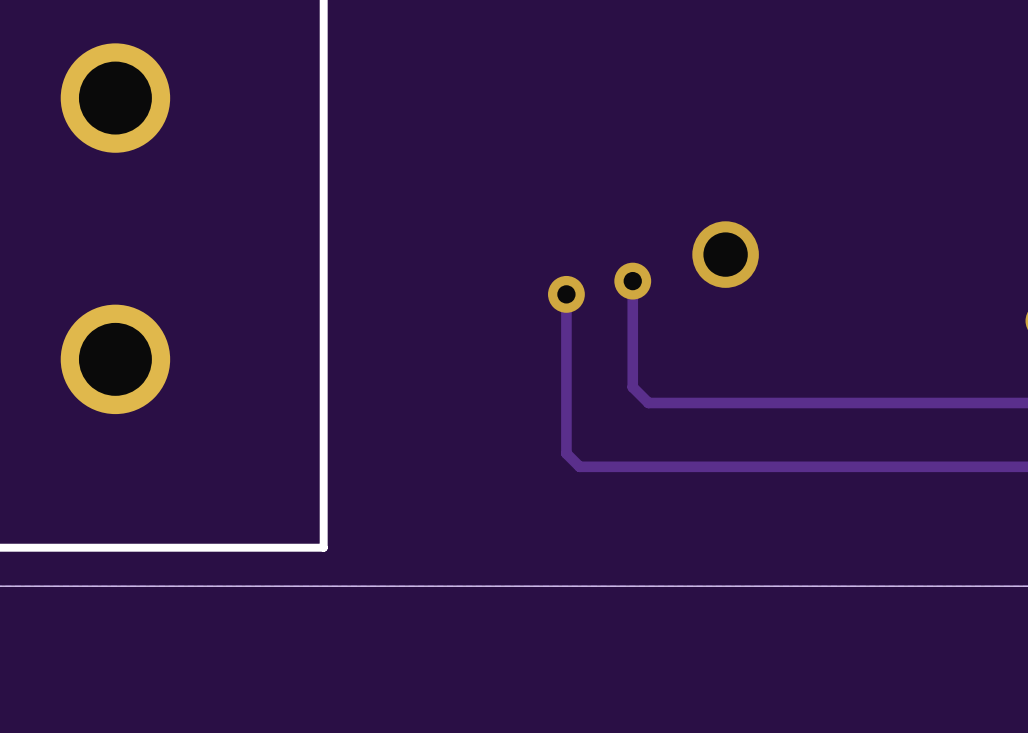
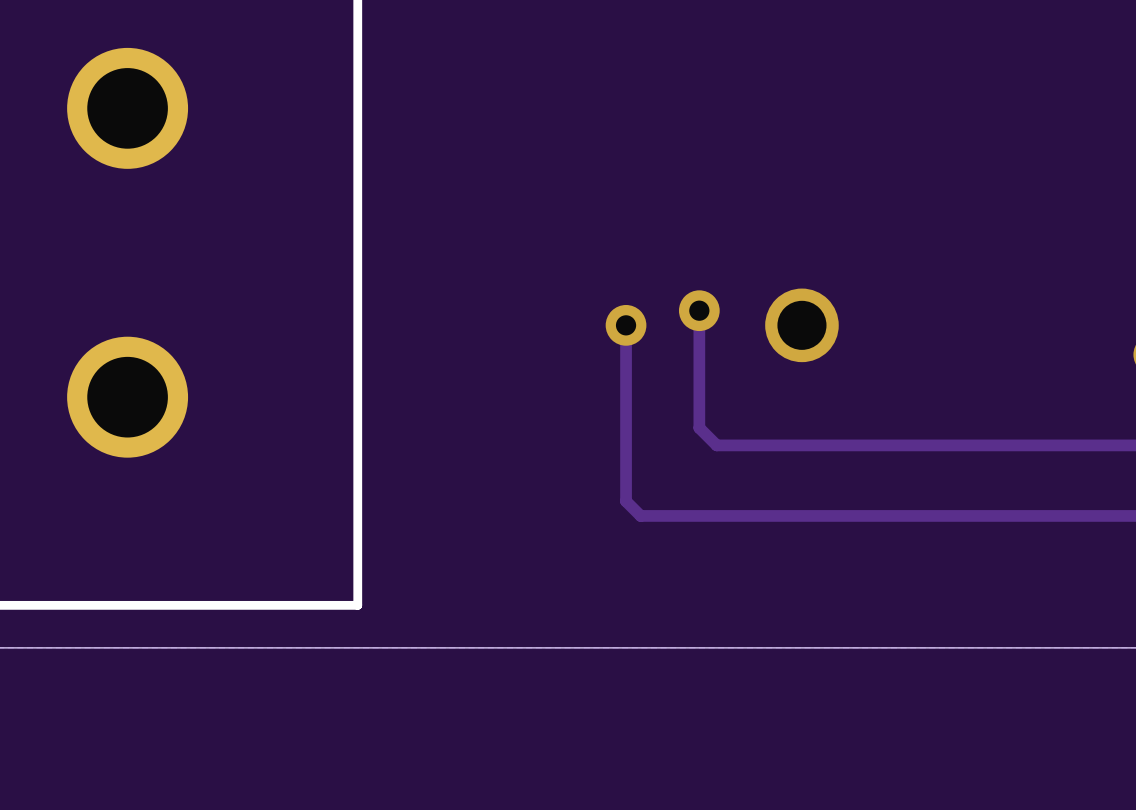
via position: (725, 254) -> (801, 325)

